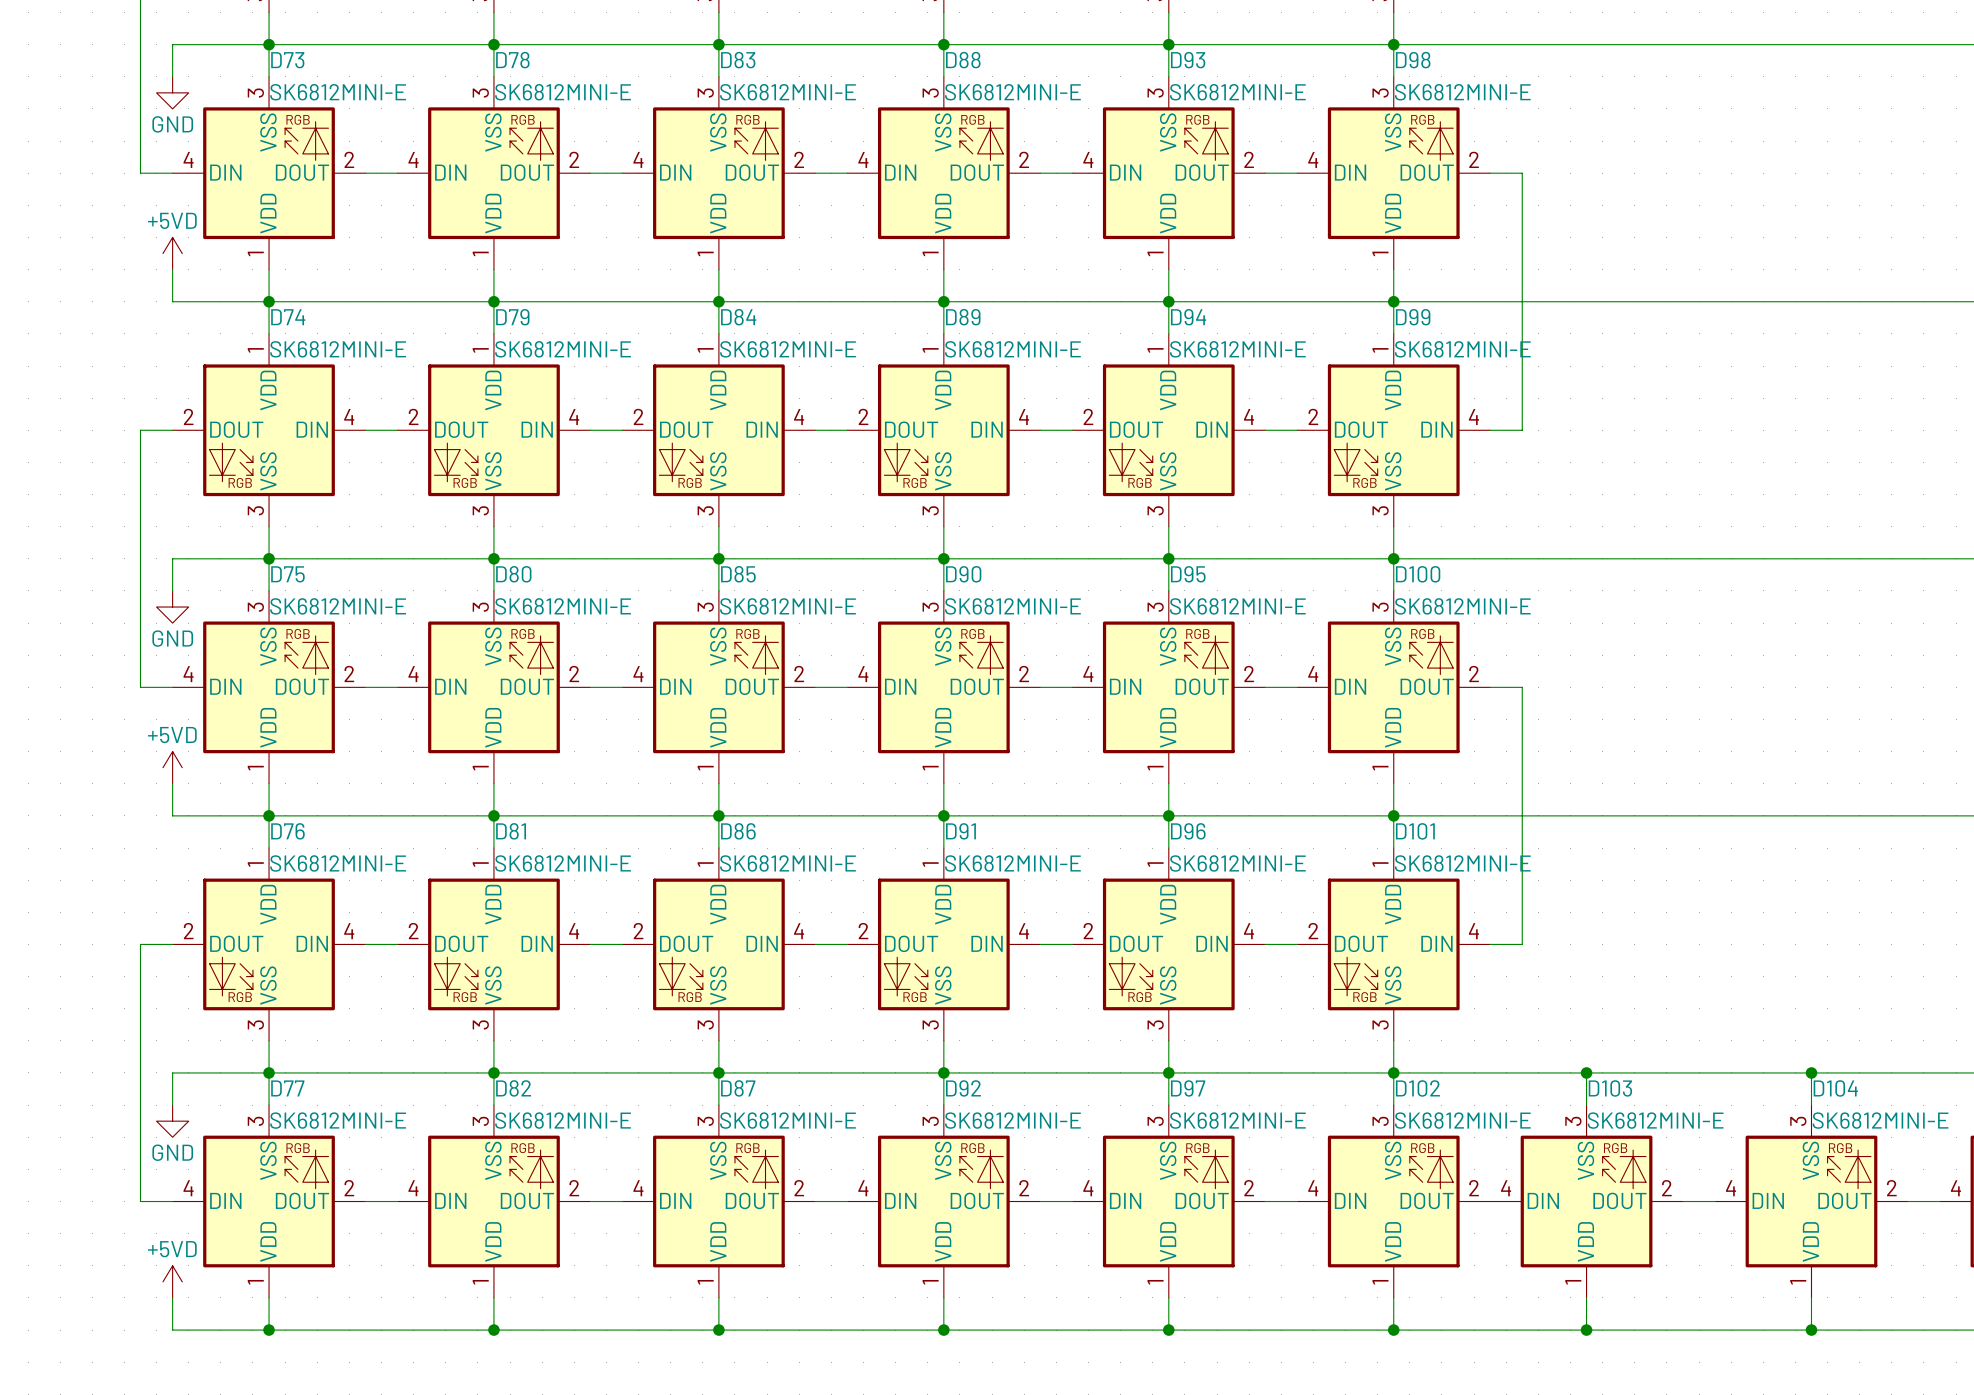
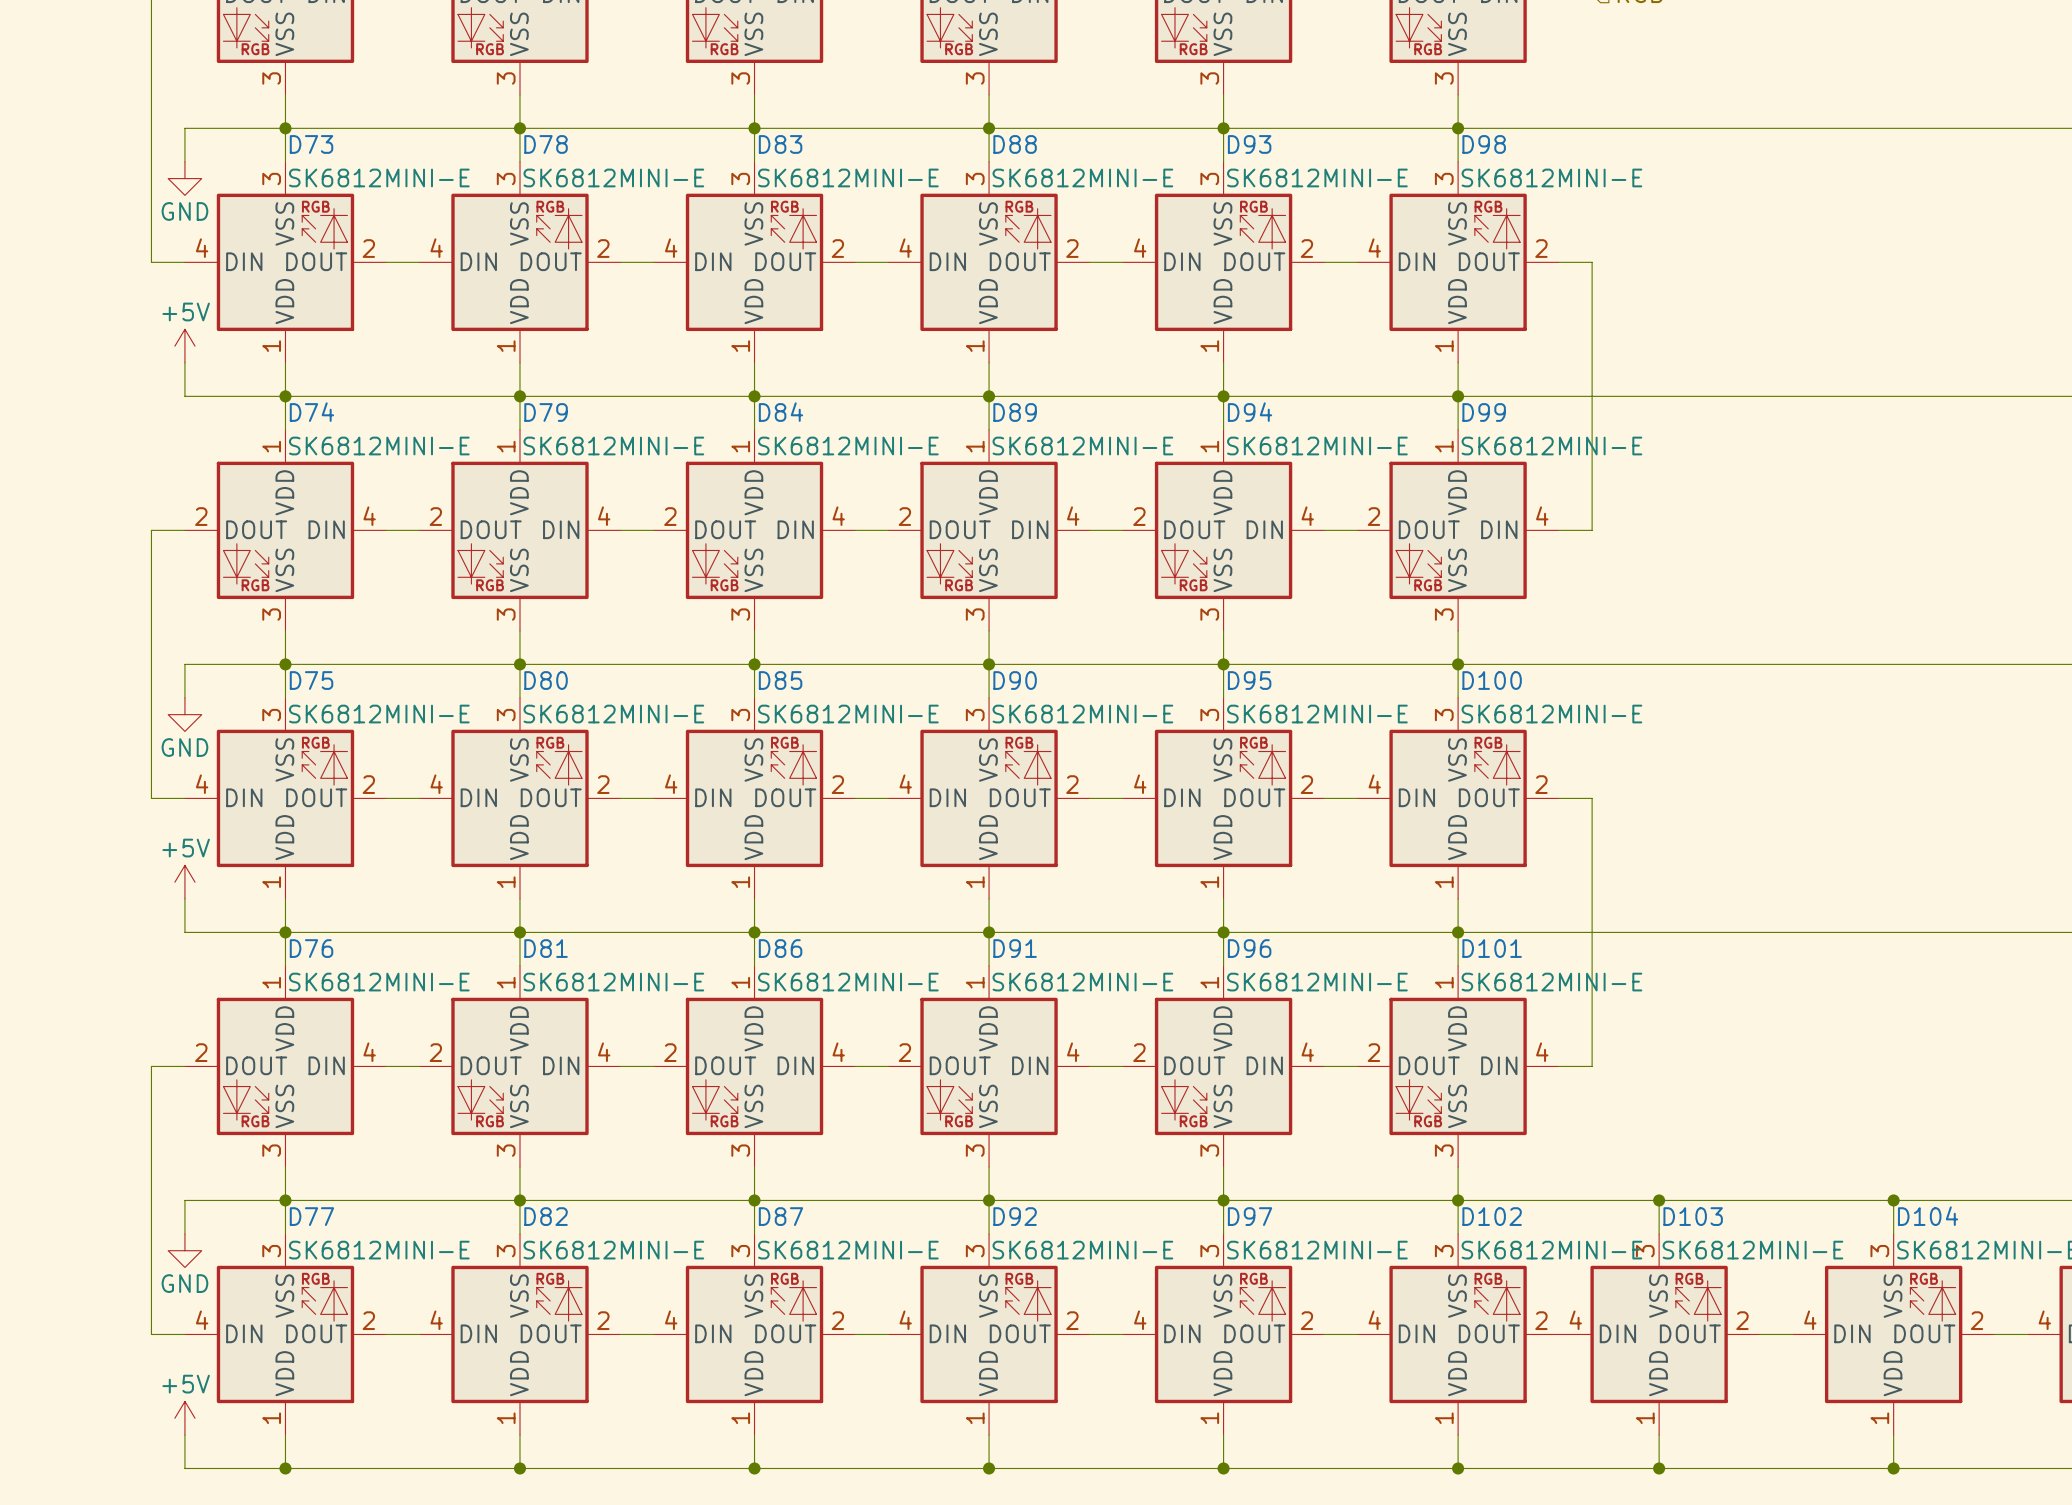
power symbol: +5VD (172, 253) -> +5V (184, 346)
power symbol: +5VD (172, 767) -> +5V (184, 882)
power symbol: +5VD (172, 1281) -> +5V (184, 1418)

